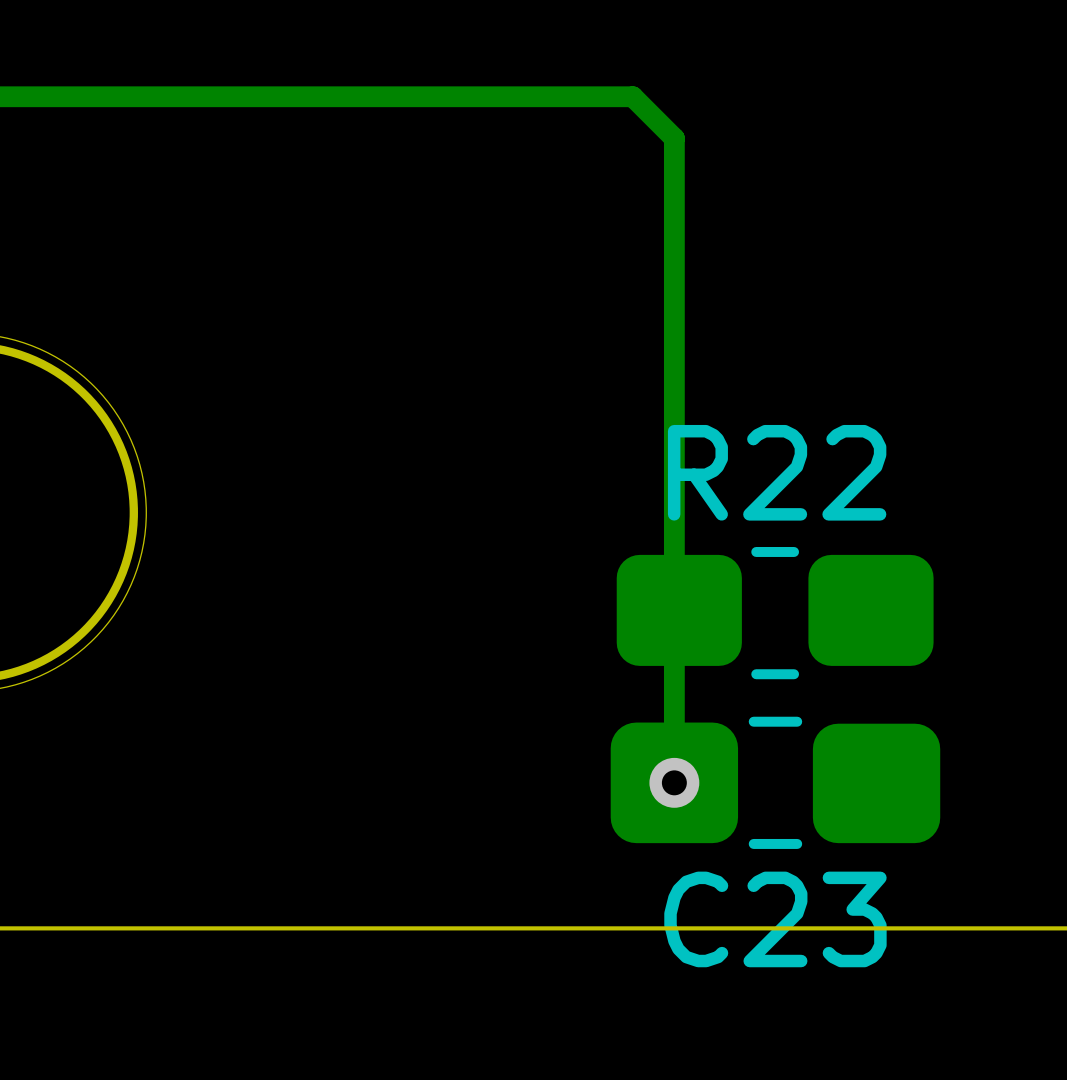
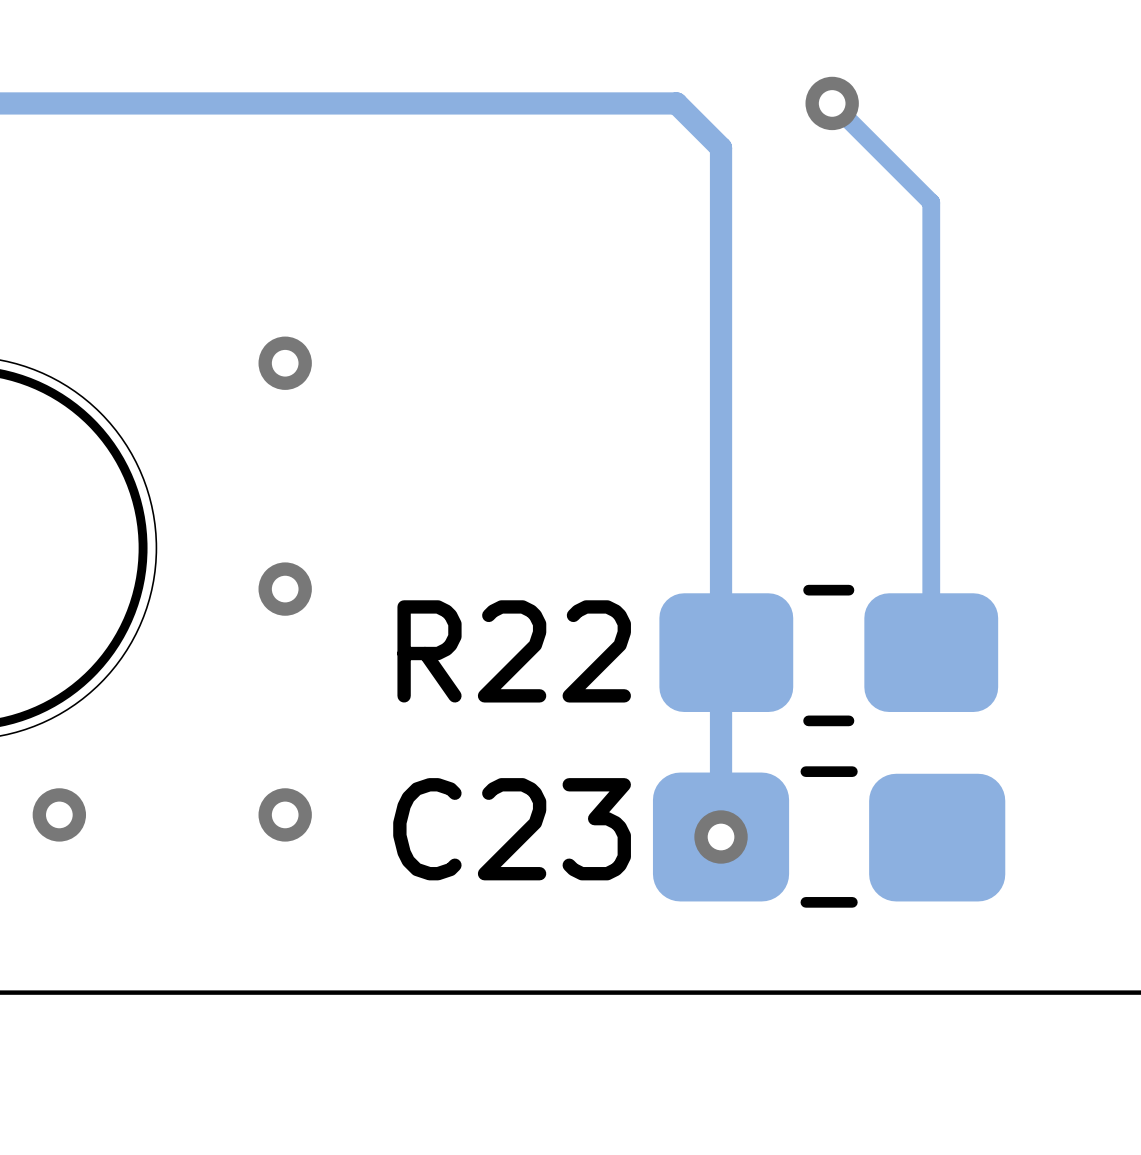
track: none -> (832, 103) (931, 202) (931, 652)
via: none -> (832, 103)
via: none -> (285, 363)
R22 name position: R22 (777, 472) -> R22 (514, 651)
via: none -> (285, 589)
via: none -> (59, 814)
via: none -> (285, 814)
C23 name position: C23 (775, 919) -> C23 (512, 829)

